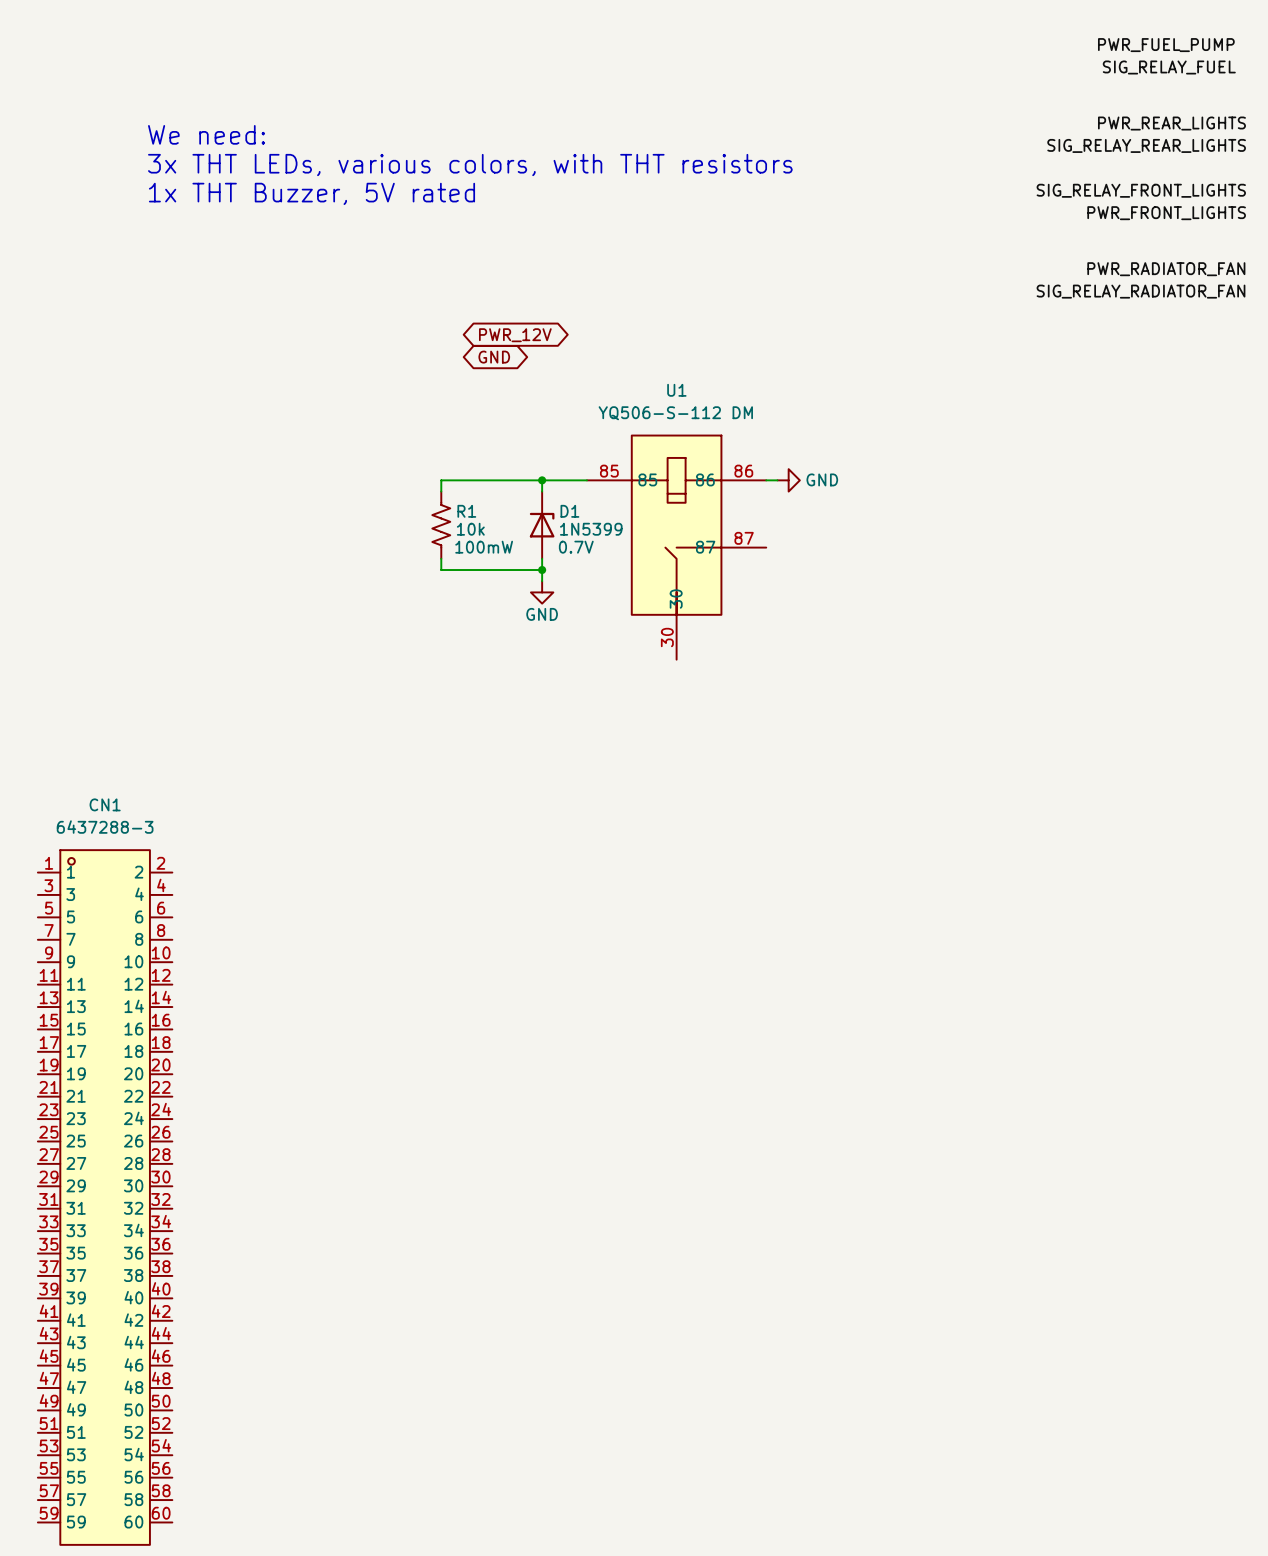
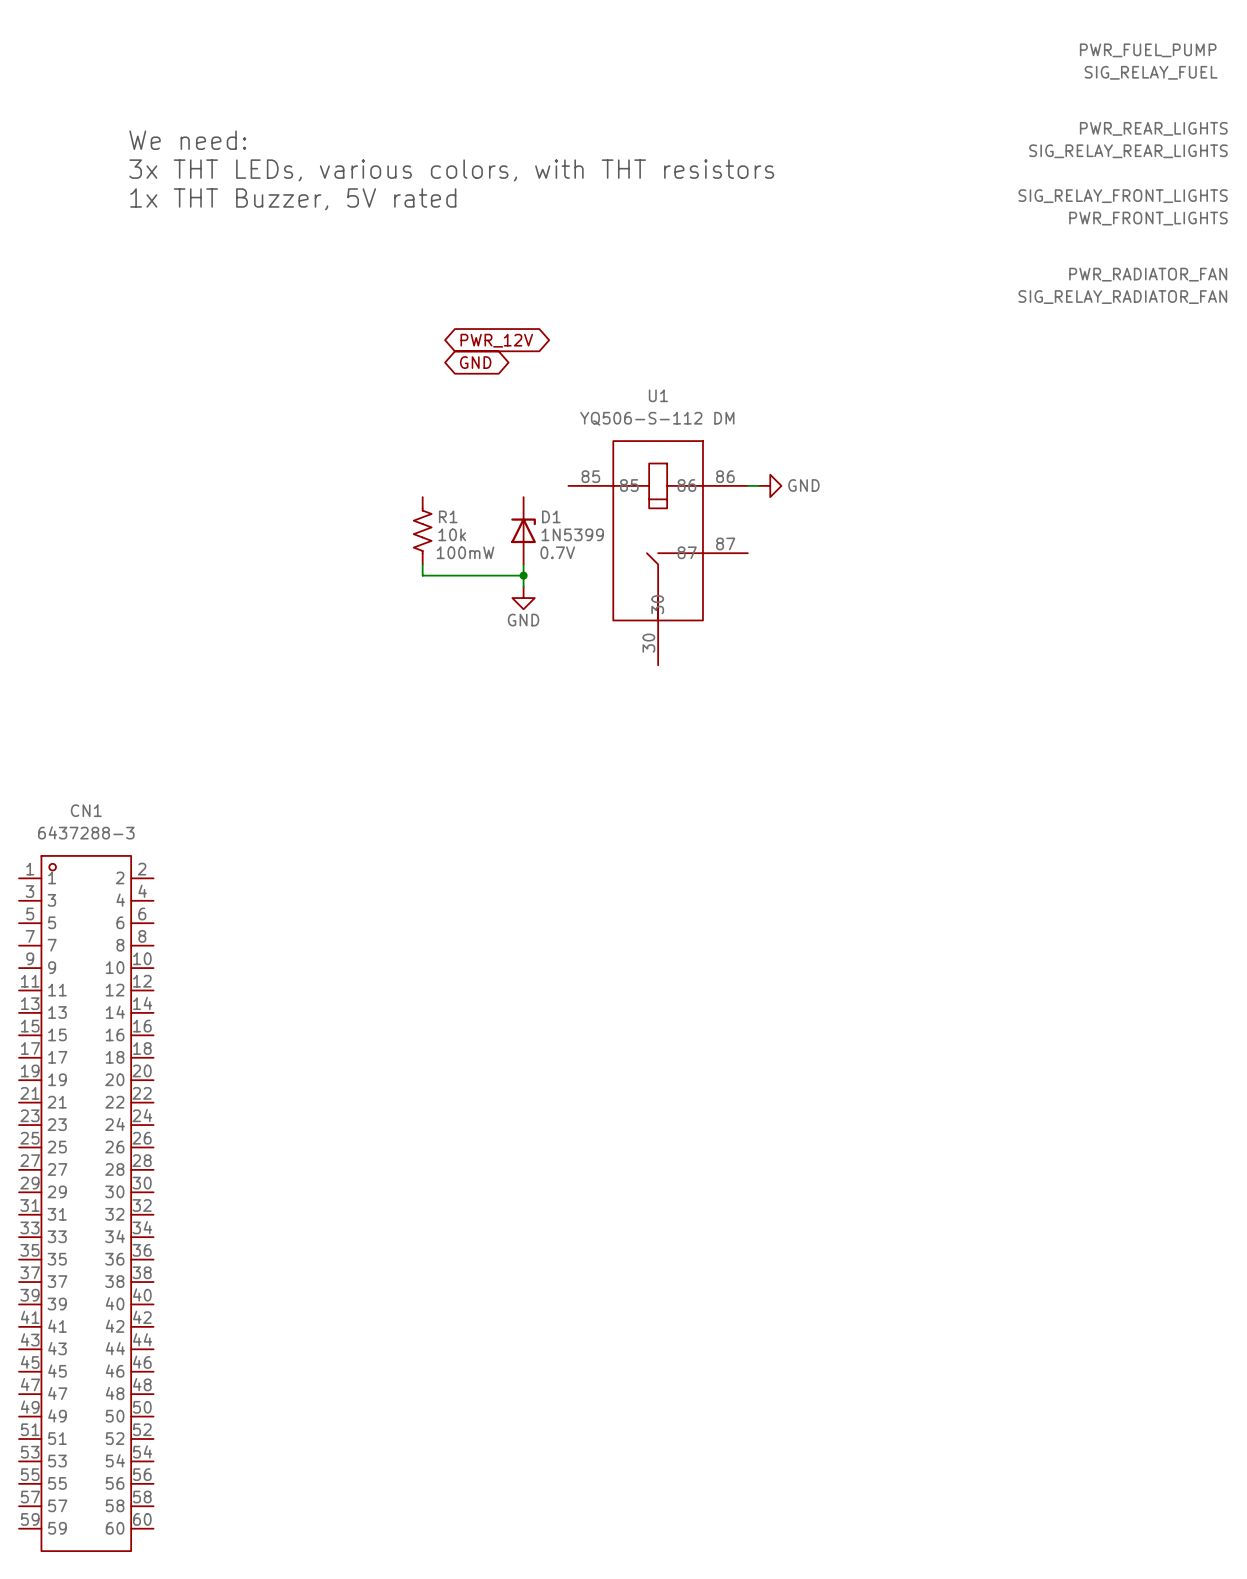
wire: (542, 480) (542, 491) -> none
junction: (542, 480) -> none
wire: (586, 480) (441, 480) (441, 491) -> none

